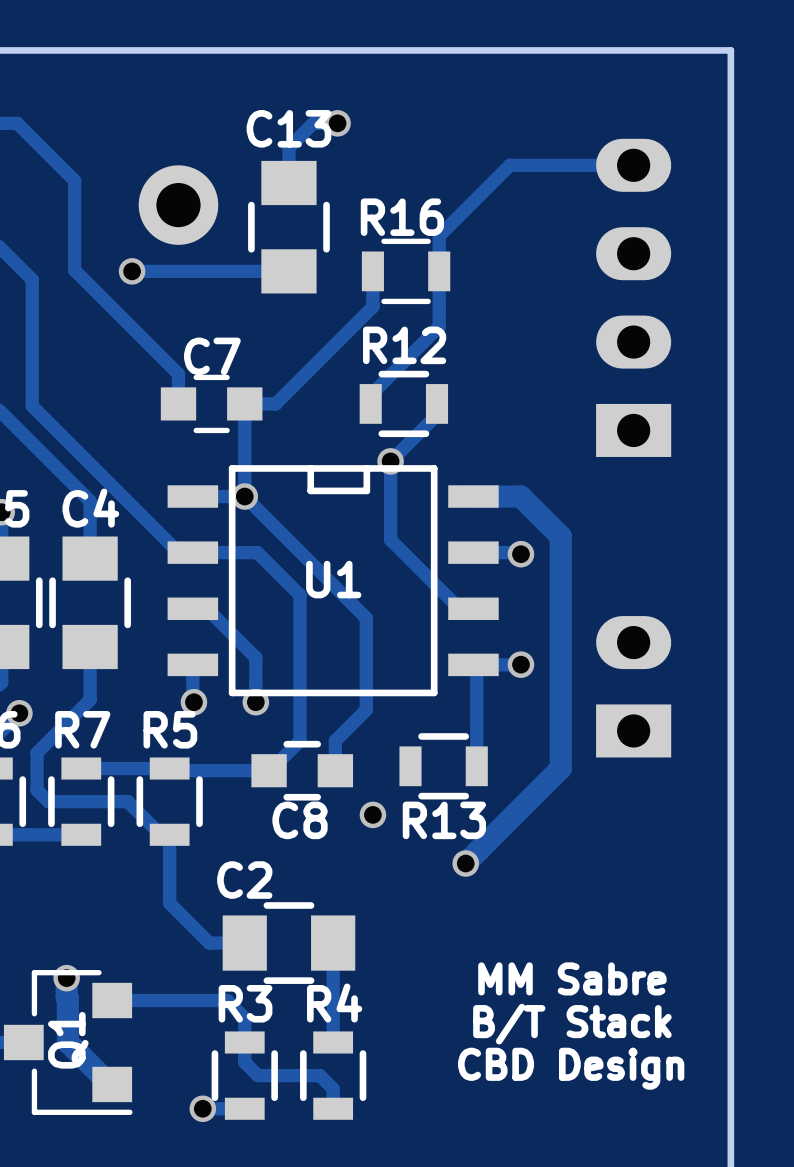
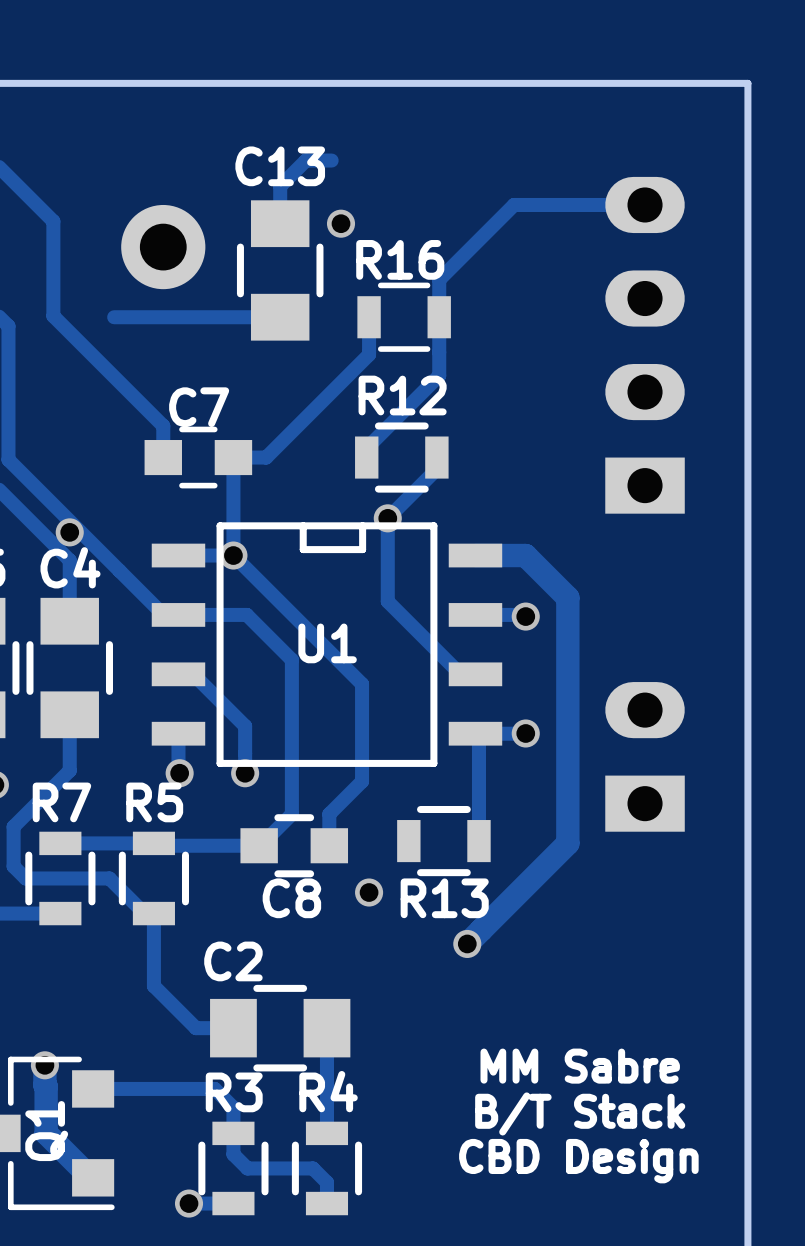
via position: (337, 123) -> (341, 223)
via: (132, 271) -> none
via: none -> (69, 532)

